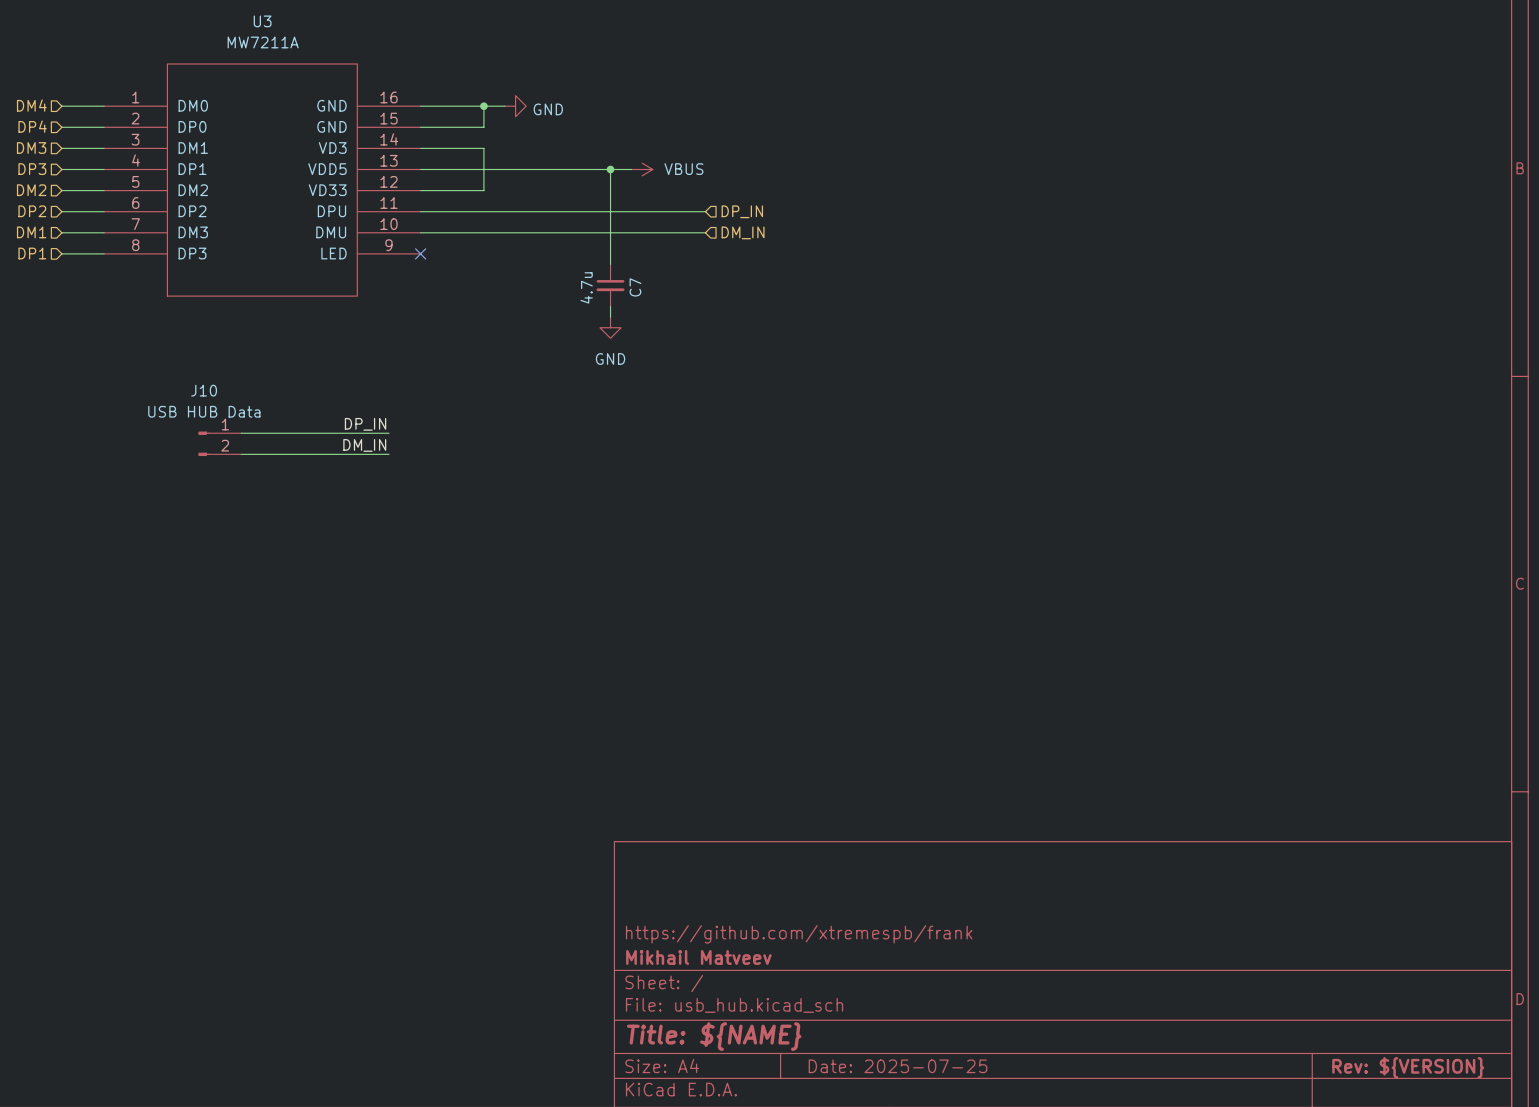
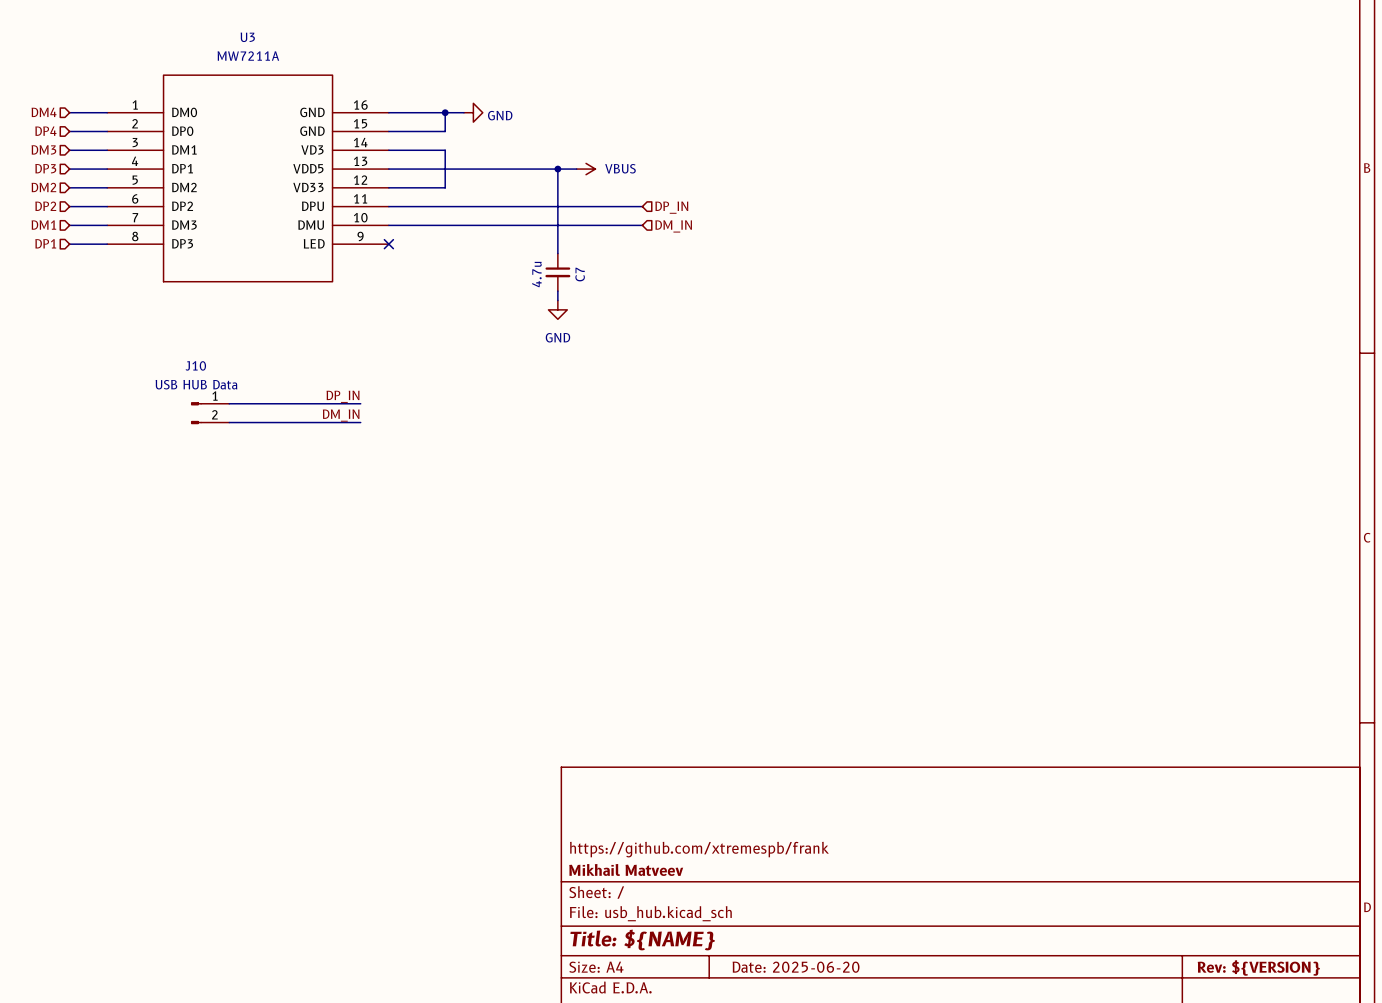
title block: Date: 2025-07-25 (898, 1066) -> Date: 2025-06-20 (796, 967)

